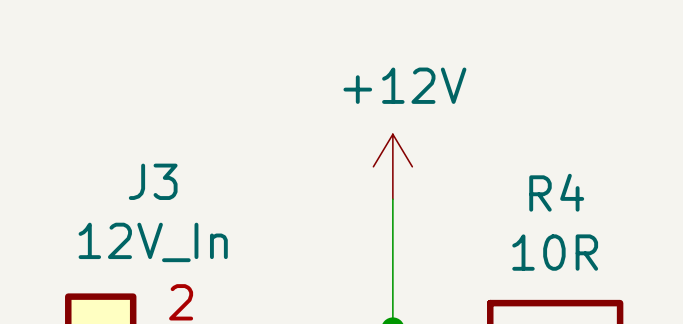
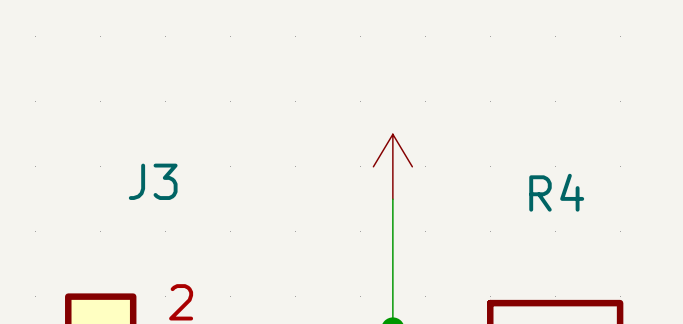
power symbol text: +12V (404, 85) -> none
J3 value: 12V_In (153, 242) -> none
R4 value: 10R (555, 252) -> none

